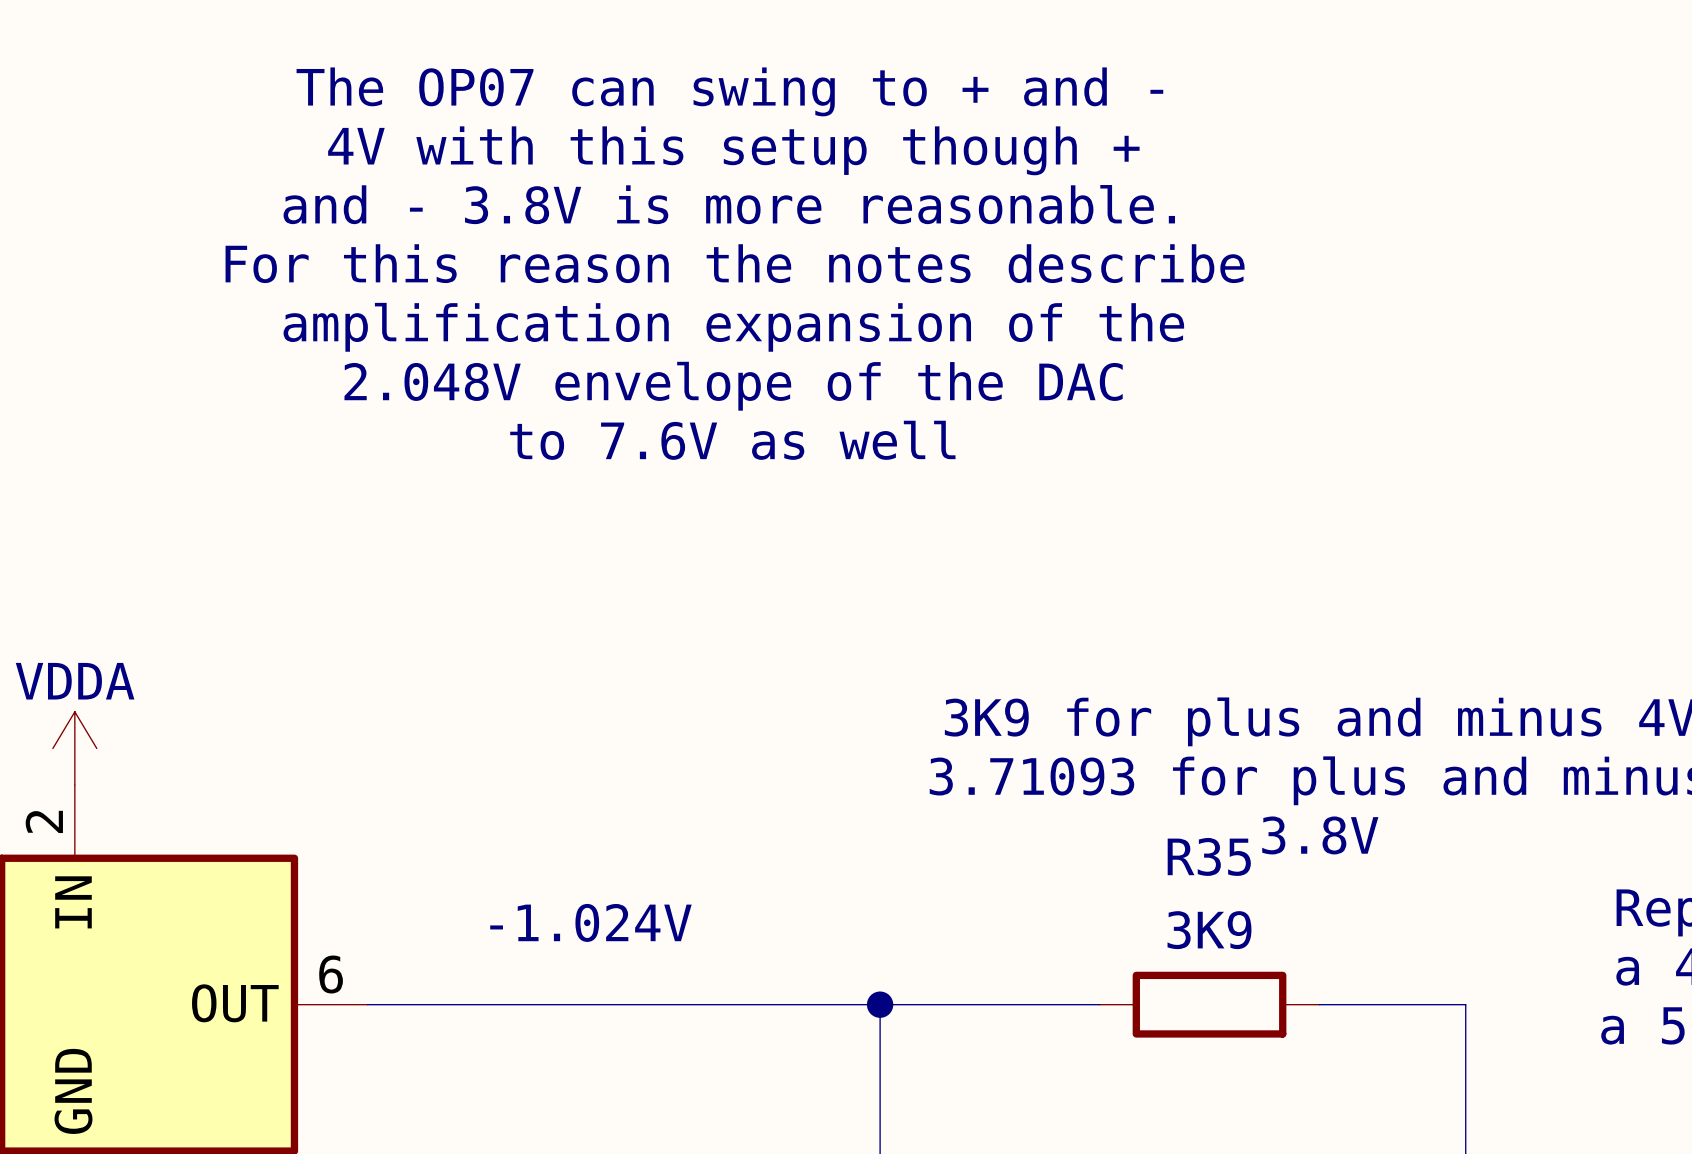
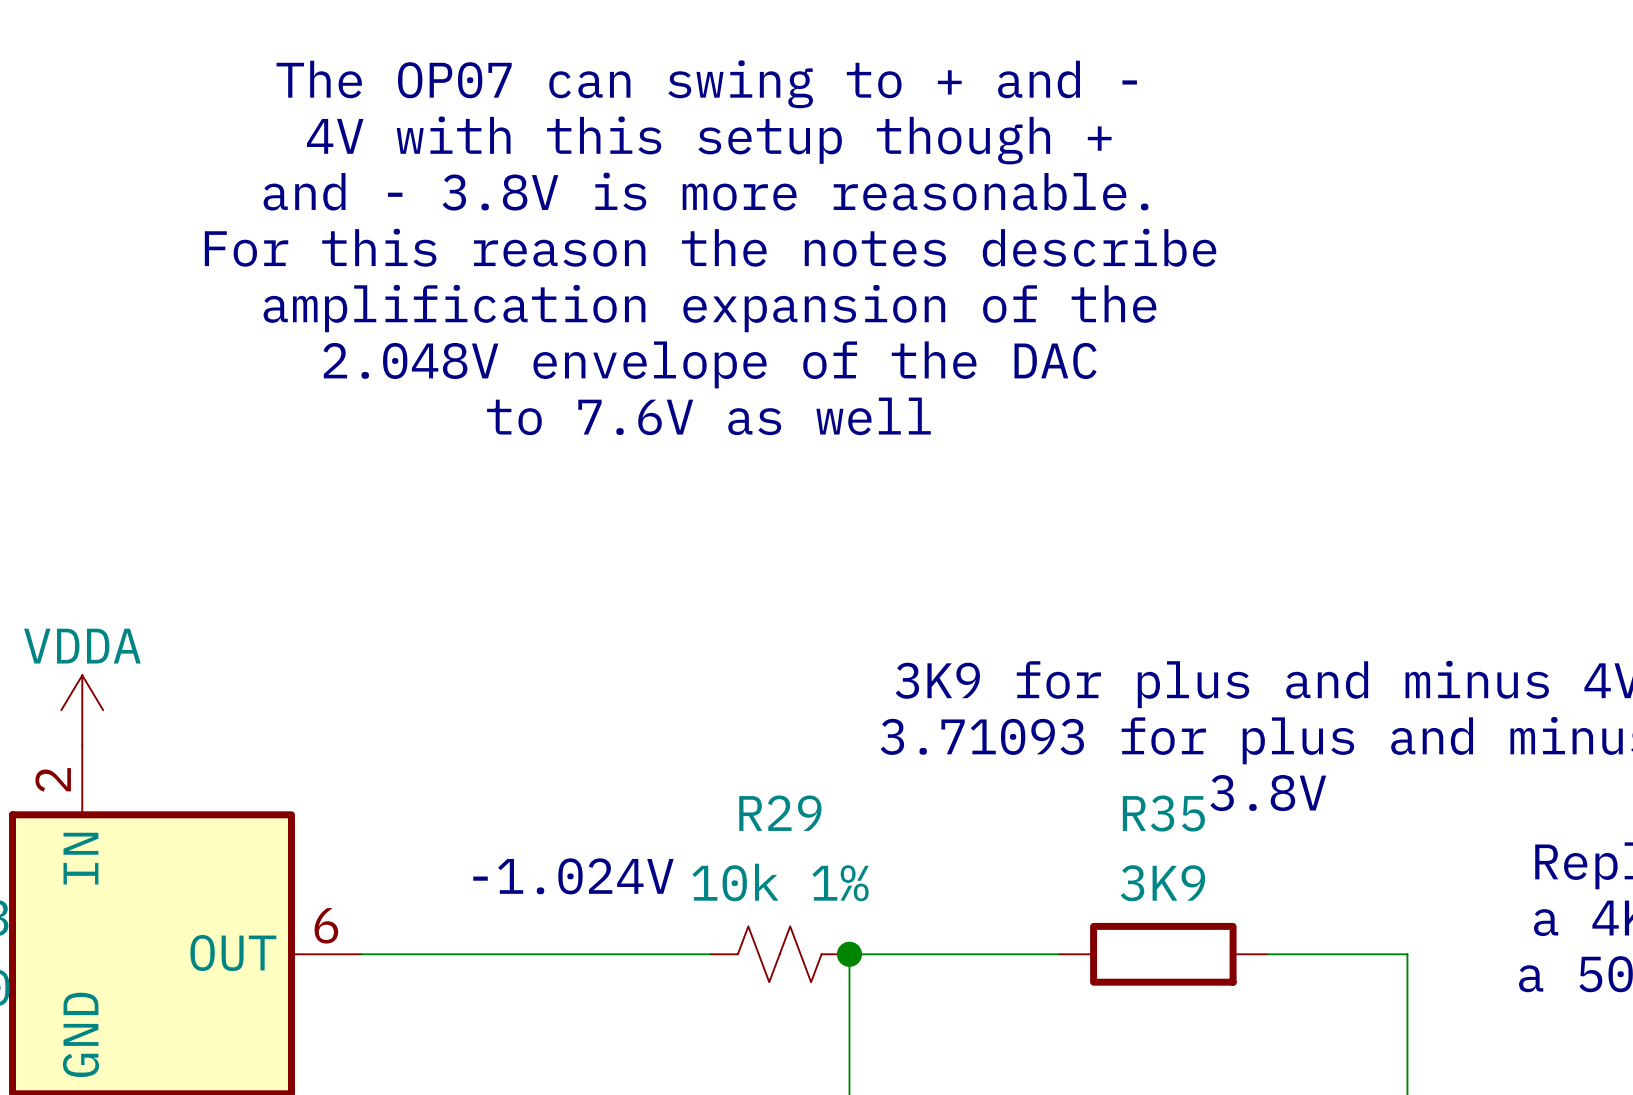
wire: (733, 1004) (880, 1004) -> none
R29: none -> 10k 1% (779, 954)

